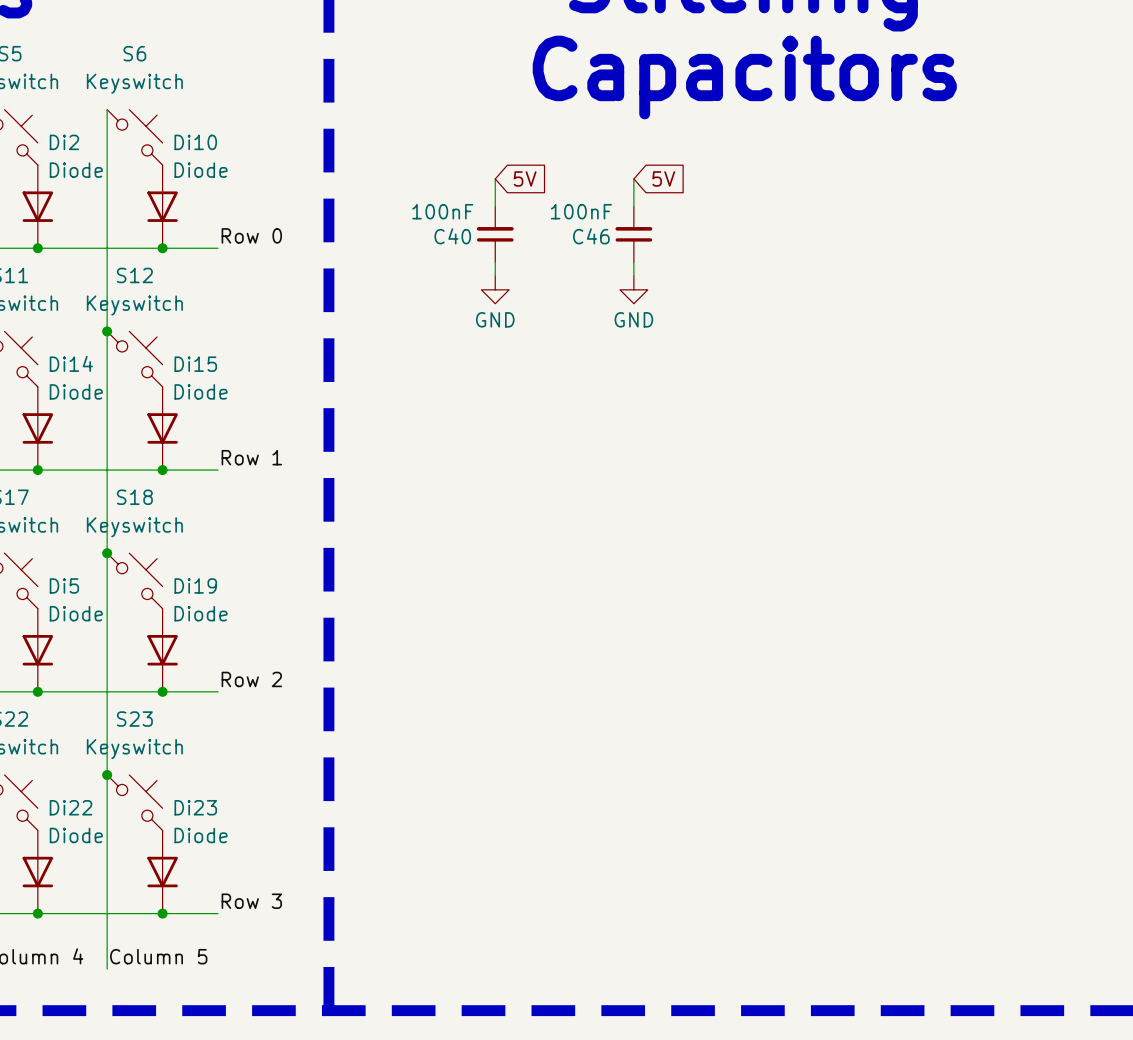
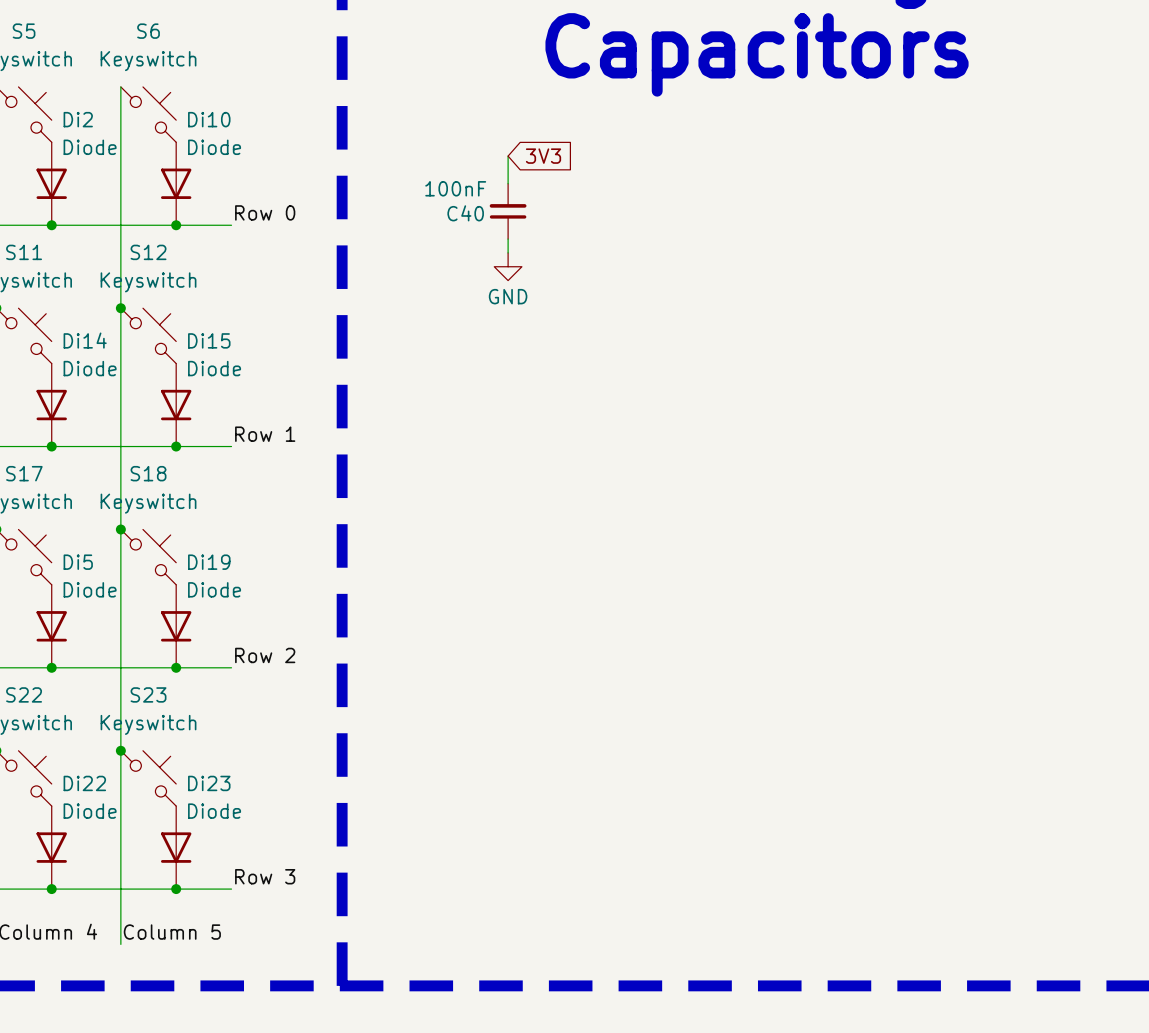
global label: 5V (525, 178) -> 3V3 (543, 156)
wire: (633, 178) (633, 206) -> none
global label: 5V (663, 178) -> none
C46: 100nF (633, 234) -> none
wire: (633, 262) (633, 275) -> none
power symbol: GND (633, 289) -> none

